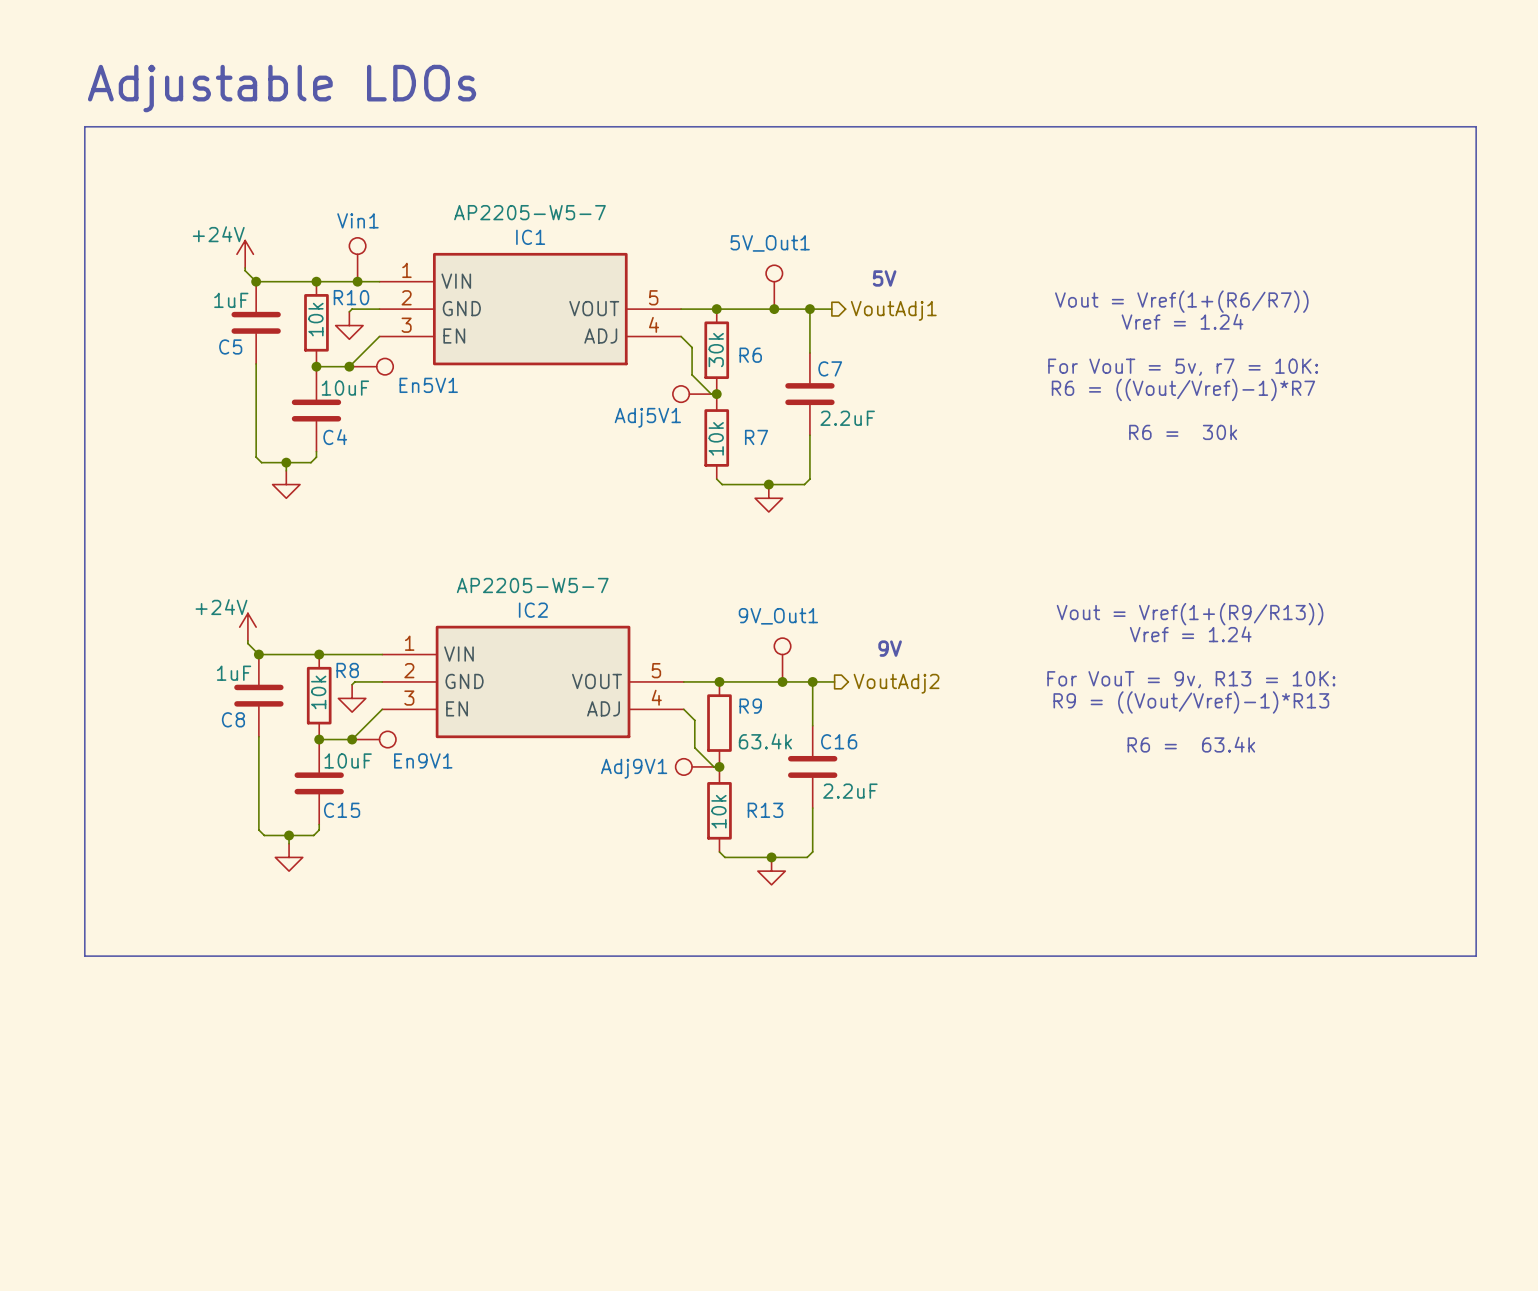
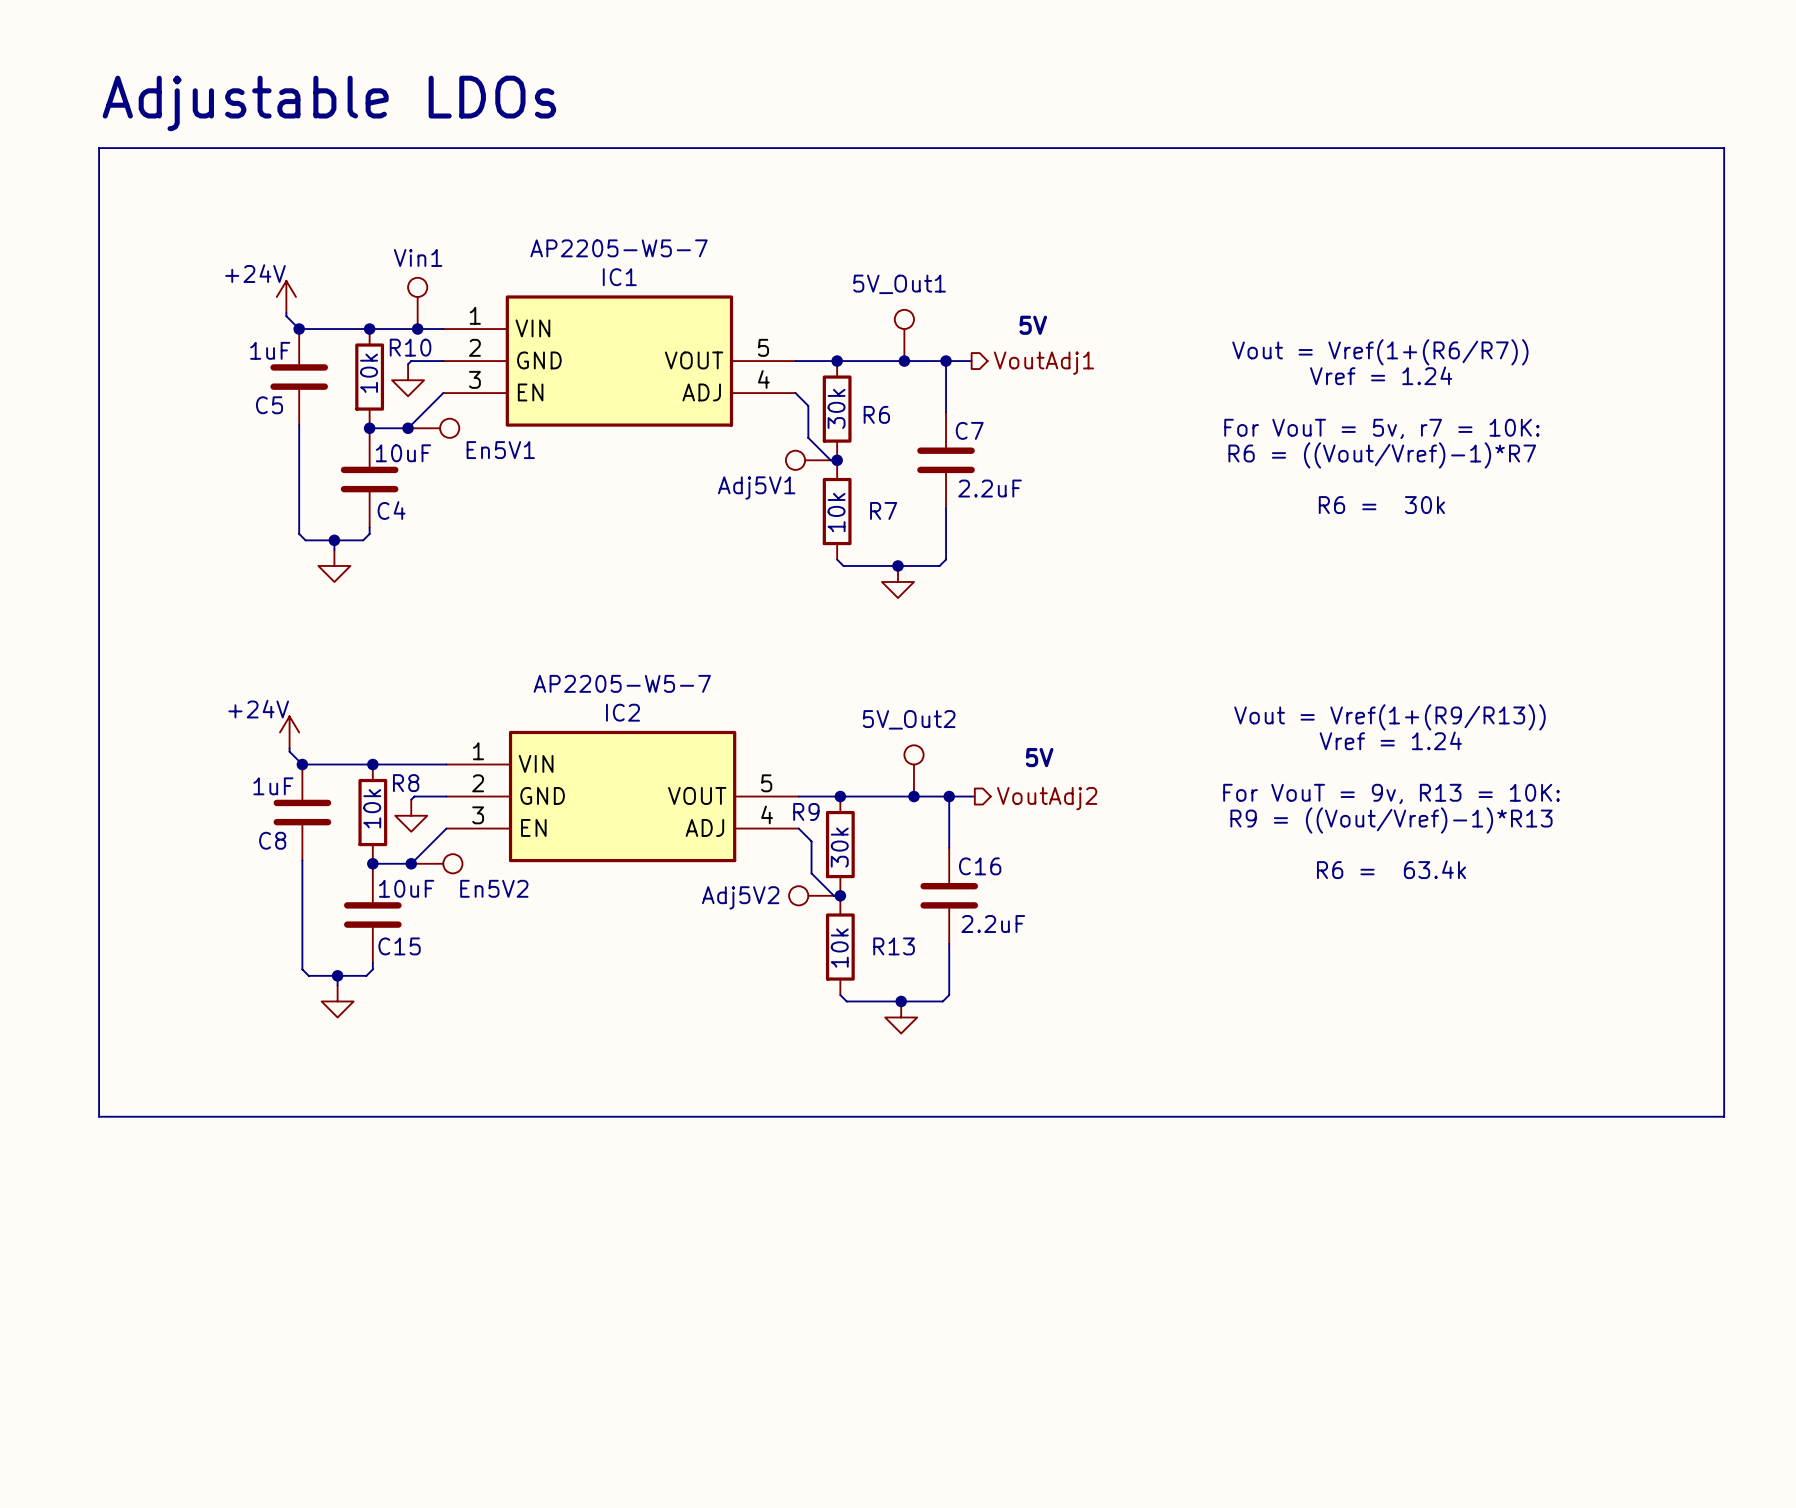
9V_Out1 name: 9V_Out1 (778, 616) -> 5V_Out2 (909, 719)
text: 9V (890, 648) -> 5V (1039, 757)
R9 name position: R9 (750, 706) -> R9 (806, 811)
R9 value: 63.4k (765, 741) -> 30k (839, 847)
En9V1 name: En9V1 (423, 760) -> En5V2 (494, 888)
Adj9V1 name: Adj9V1 (634, 768) -> Adj5V2 (740, 897)

